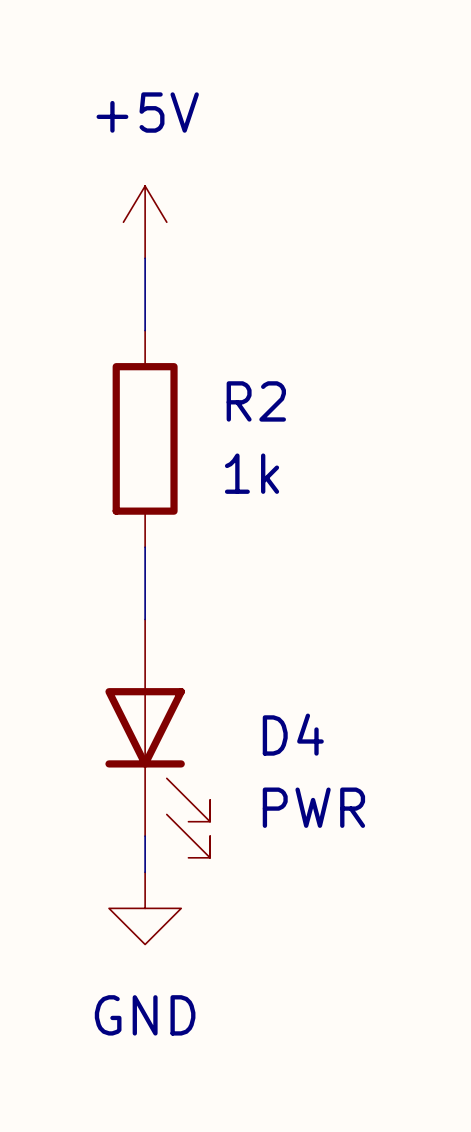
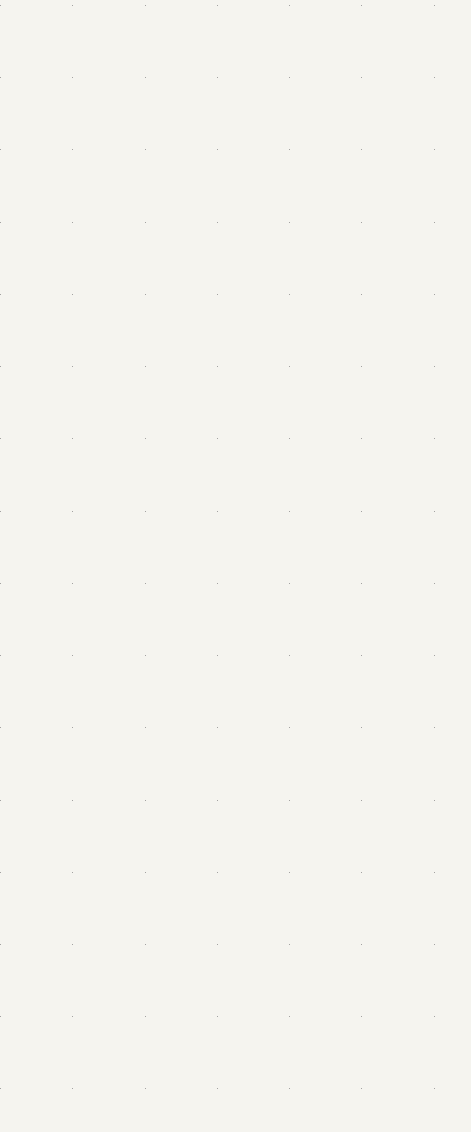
power symbol: +5V (145, 222) -> none
wire: (145, 258) (145, 330) -> none
R2: 1k (145, 438) -> none
wire: (145, 547) (145, 619) -> none
D4: PWR (157, 738) -> none
wire: (145, 836) (145, 872) -> none
power symbol: GND (145, 908) -> none

